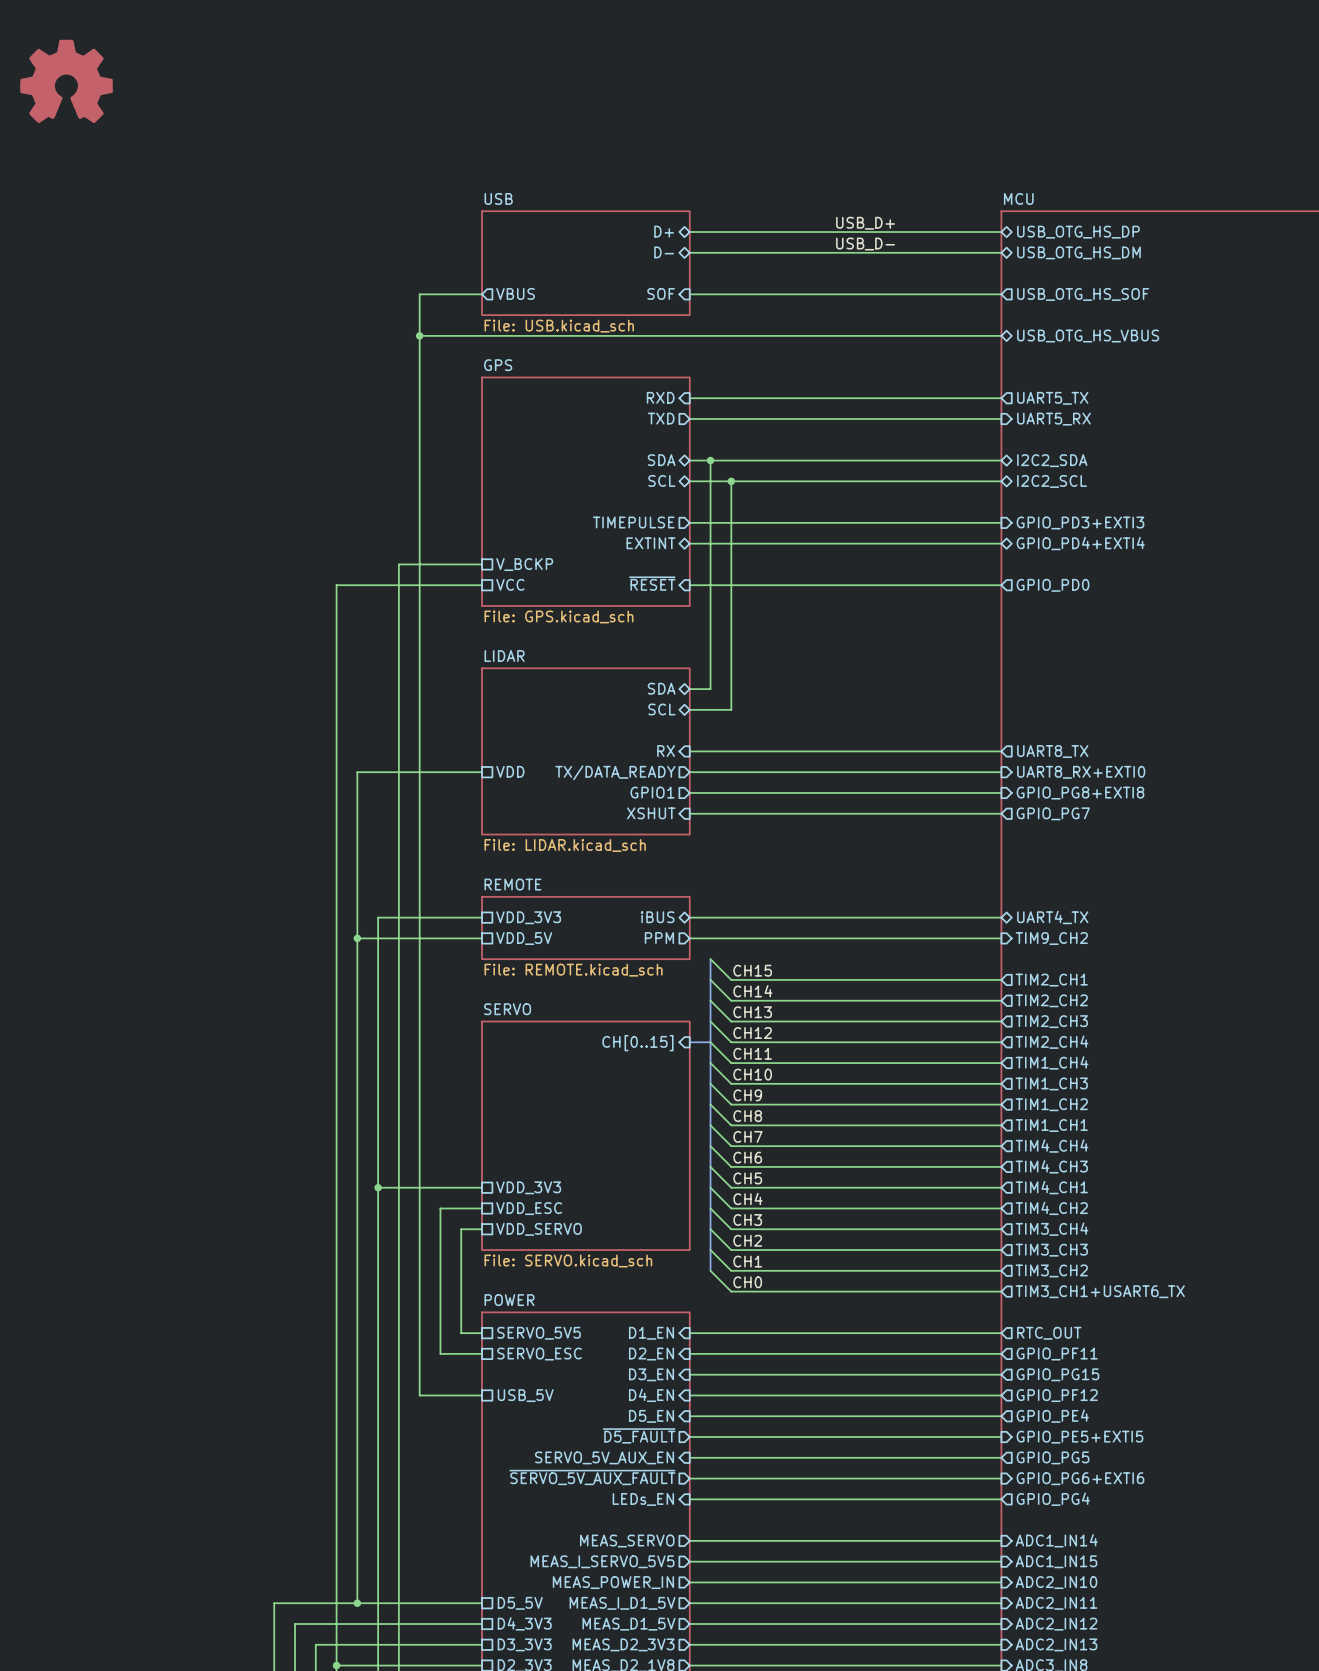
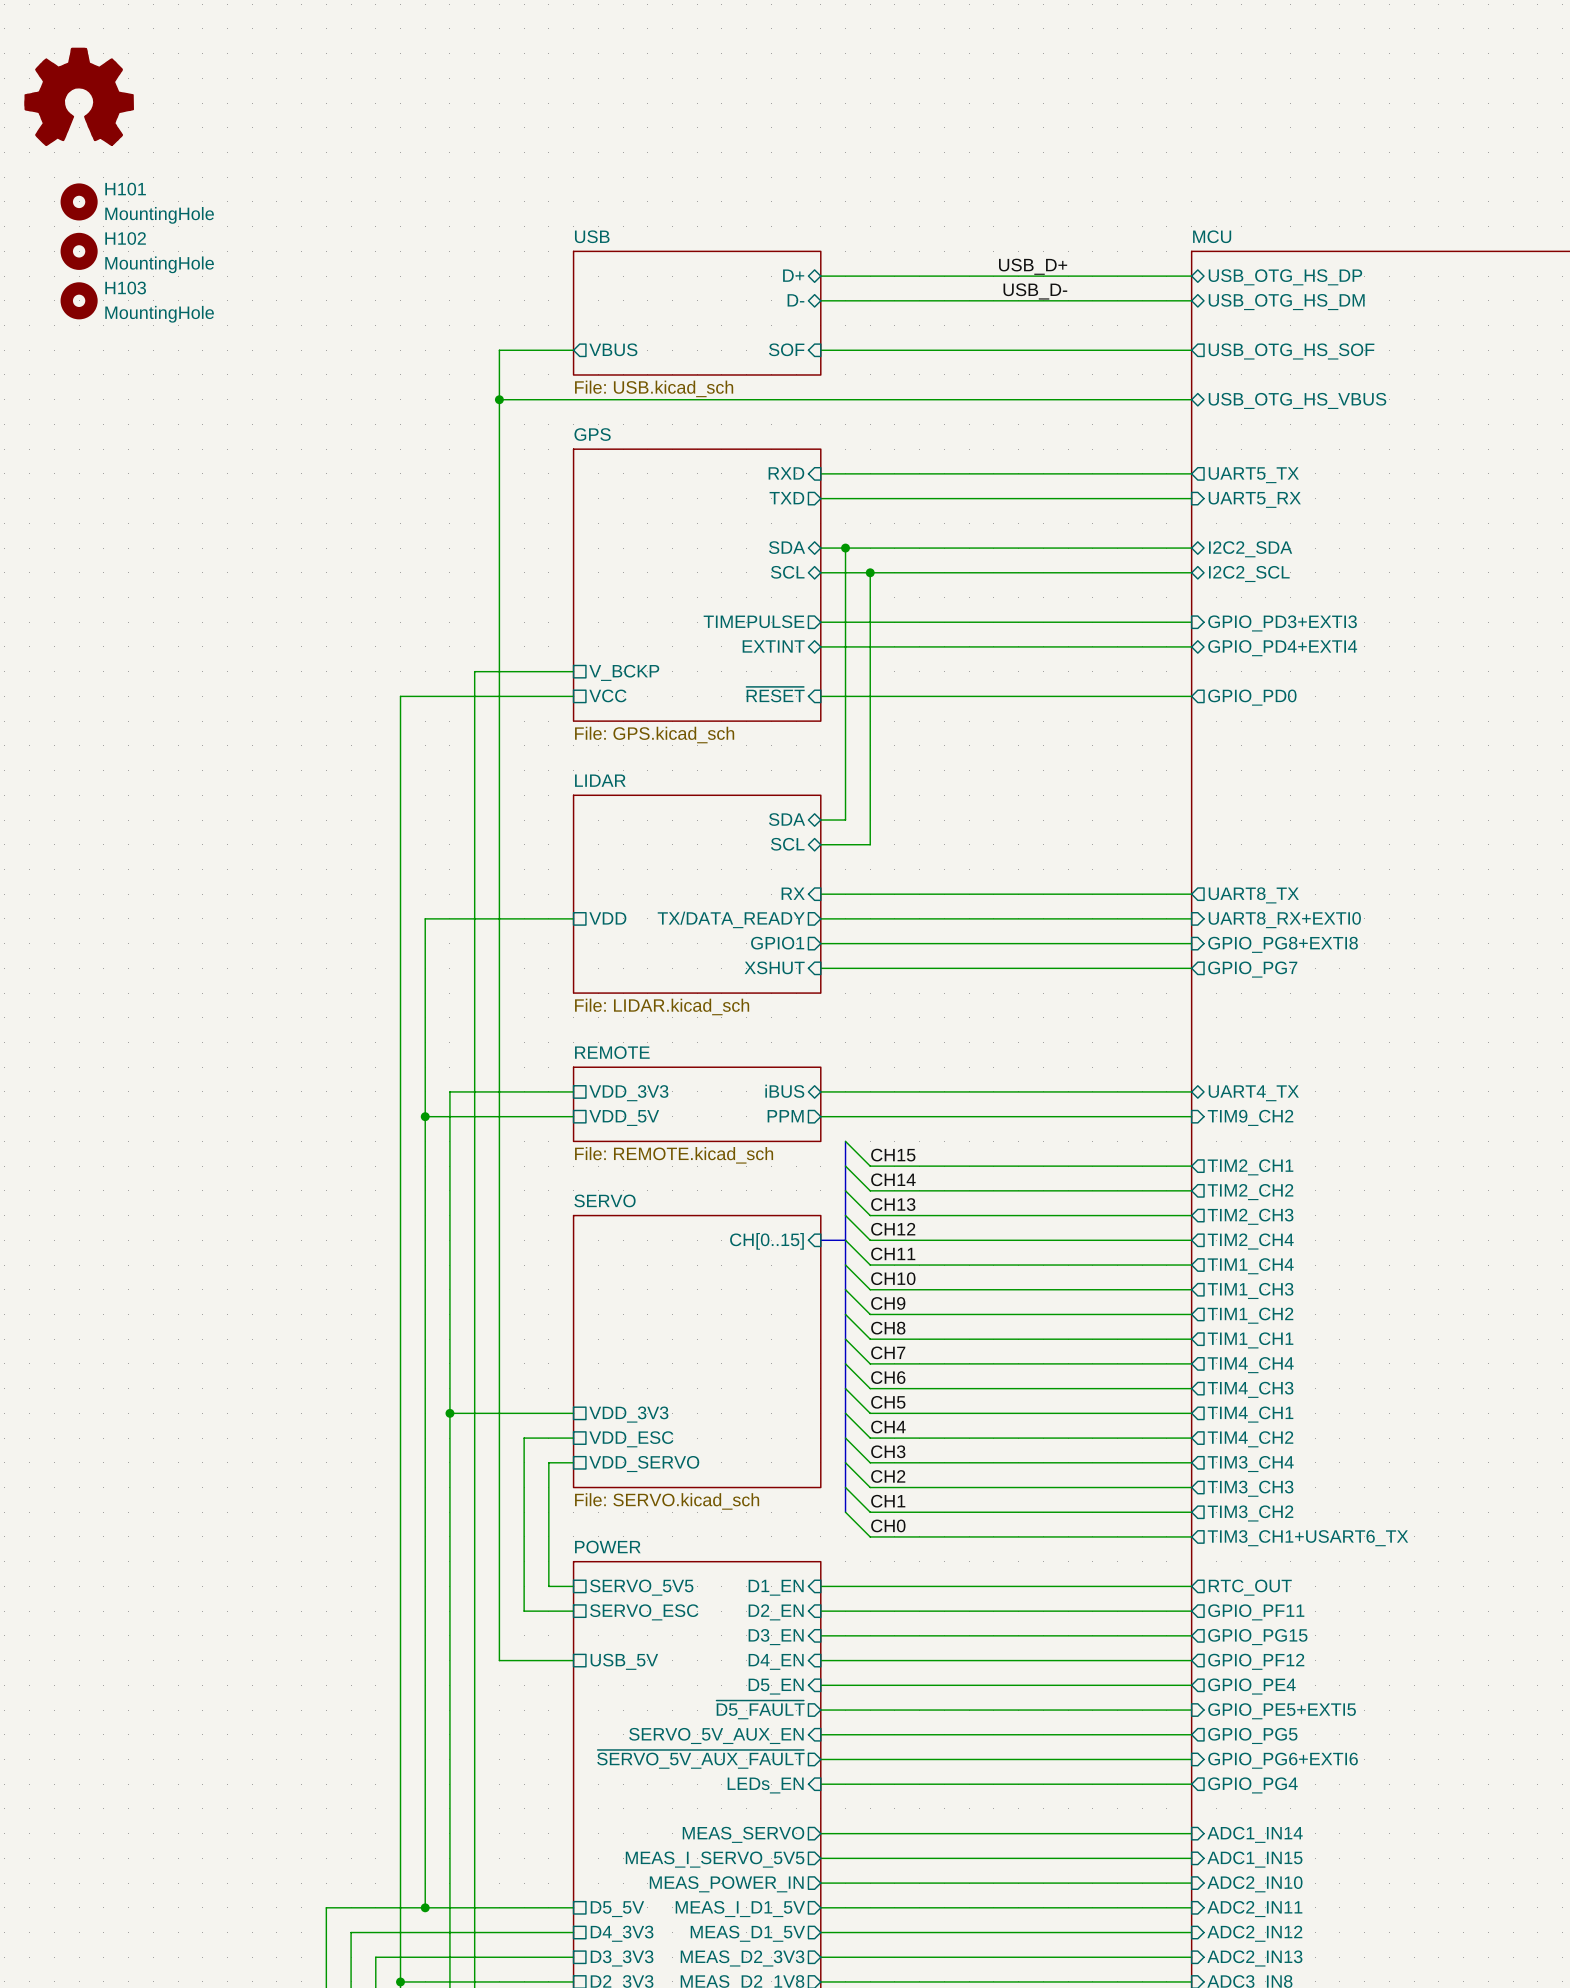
H101: none -> MountingHole (79, 201)
H102: none -> MountingHole (79, 251)
H103: none -> MountingHole (79, 300)

